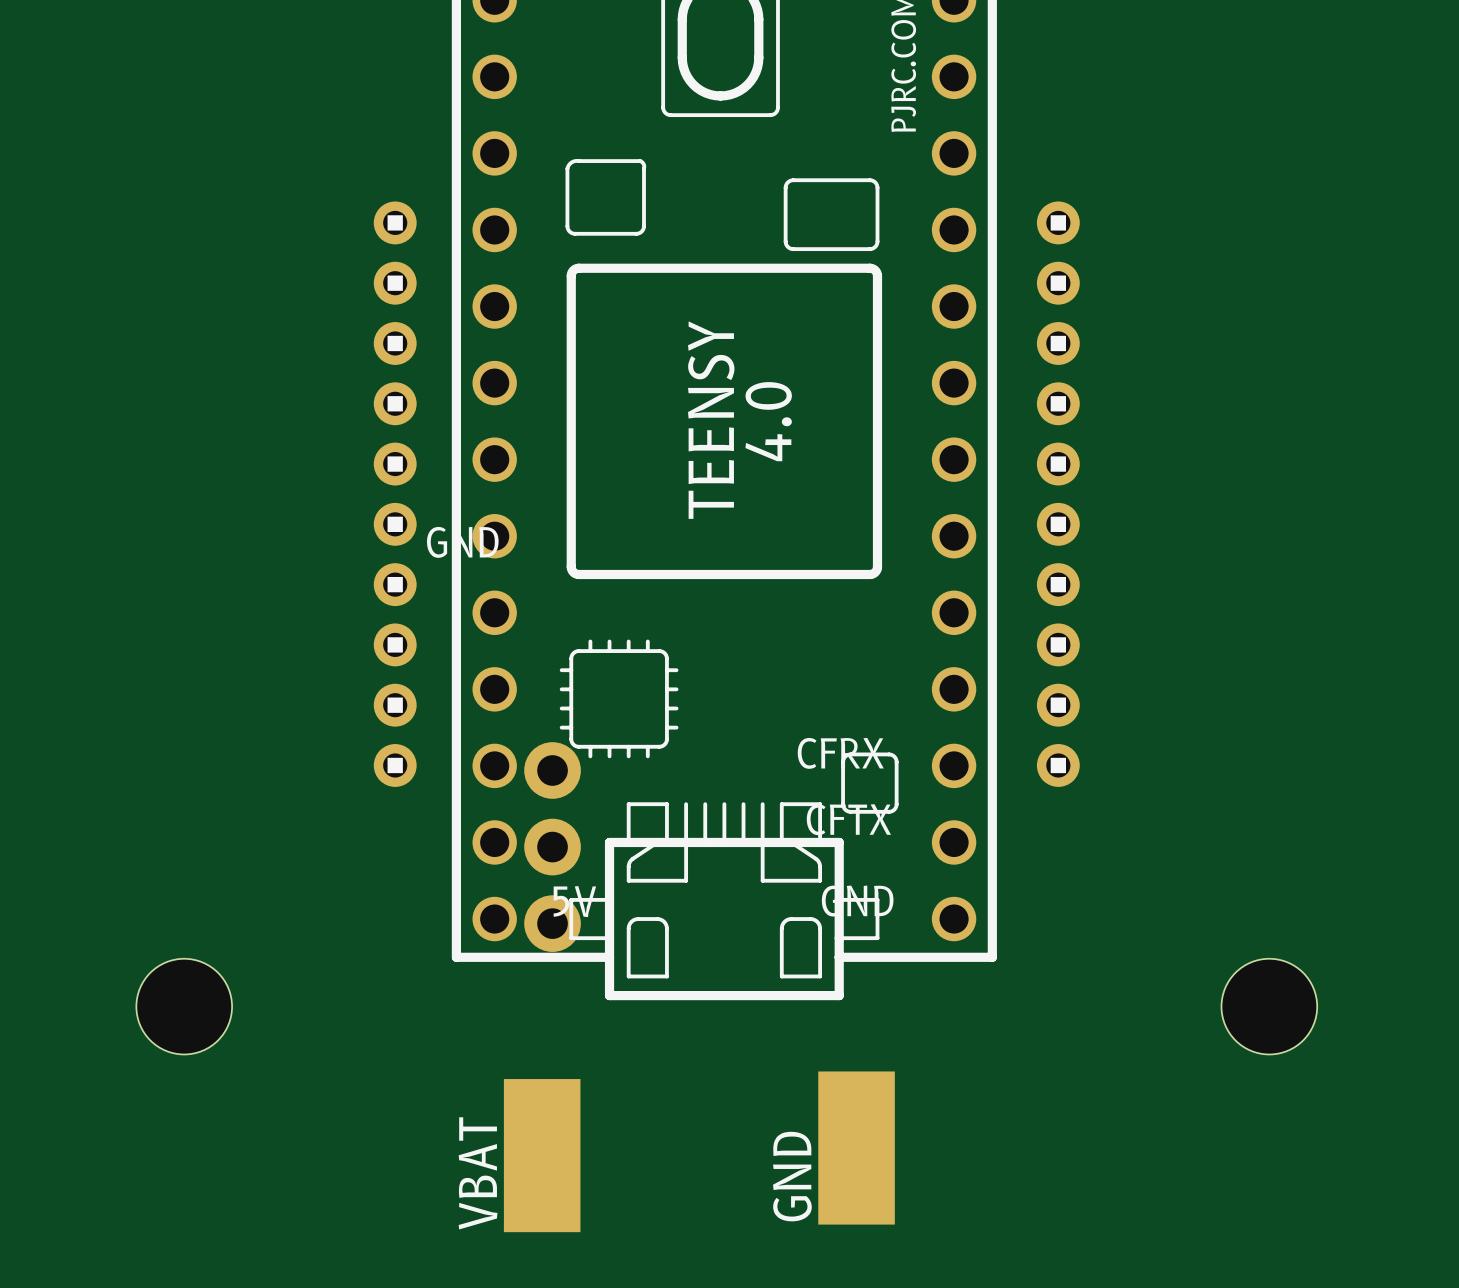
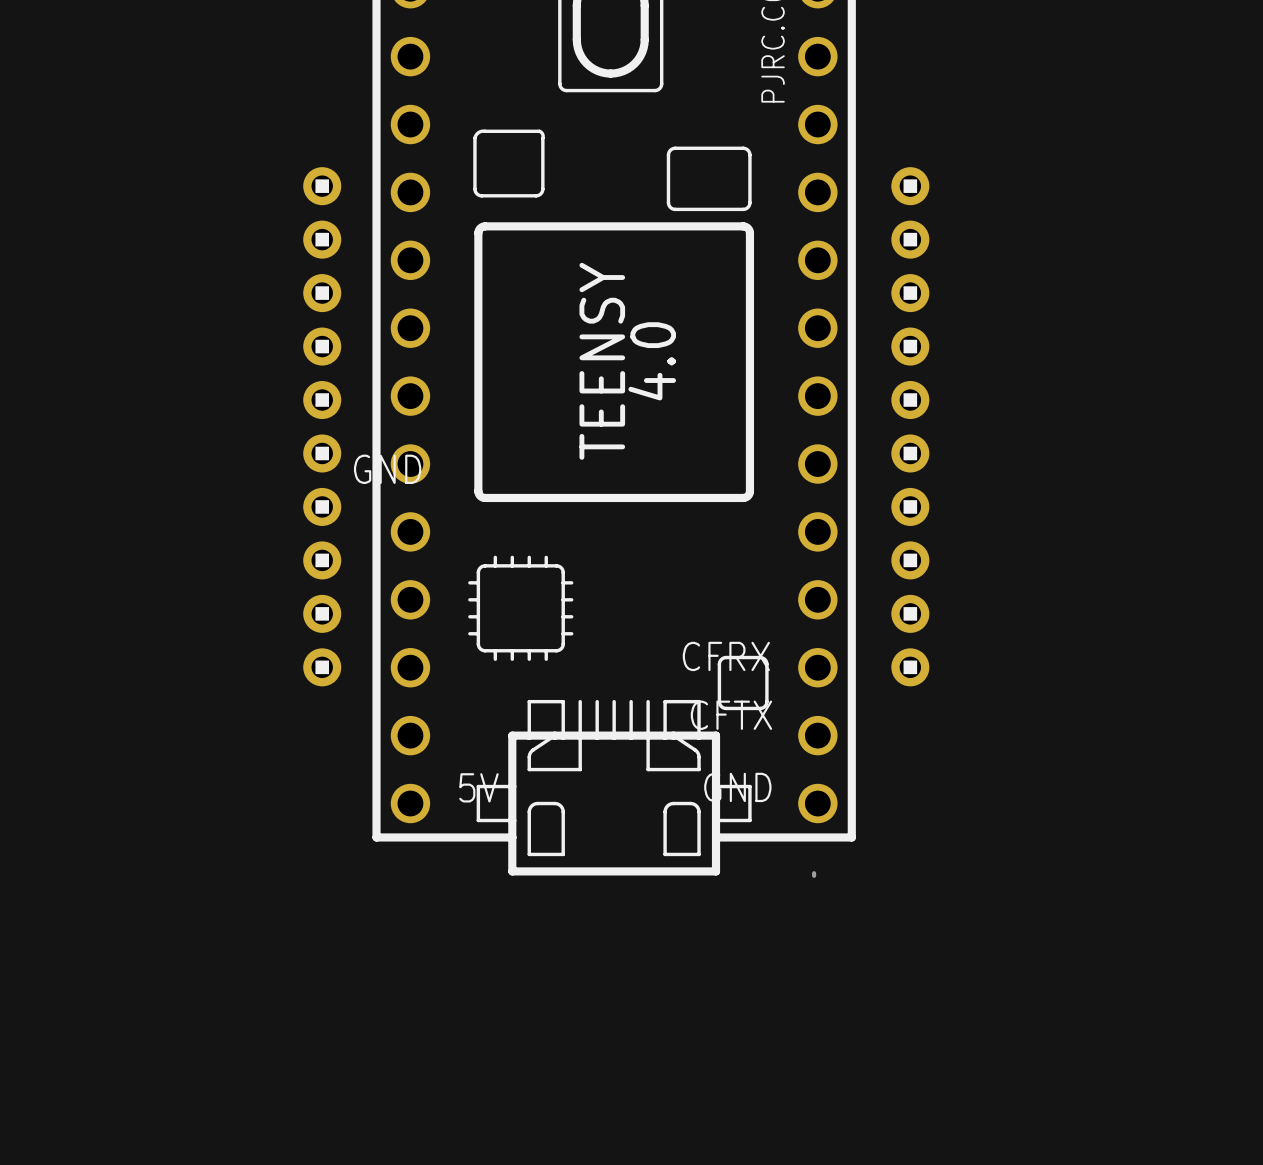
part: (552, 847) -> none
board edge: none -> (814, 873) (814, 875)
hole: (184, 1006) -> none
hole: (1269, 1006) -> none
GND: (856, 1148) -> none
VBAT: (542, 1155) -> none

